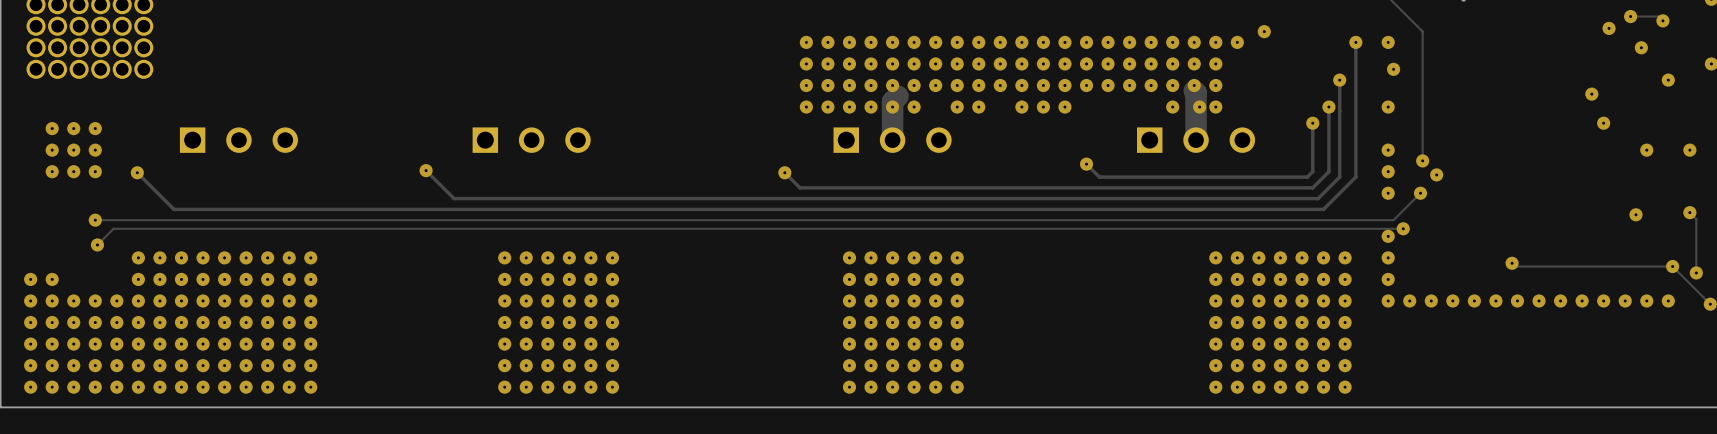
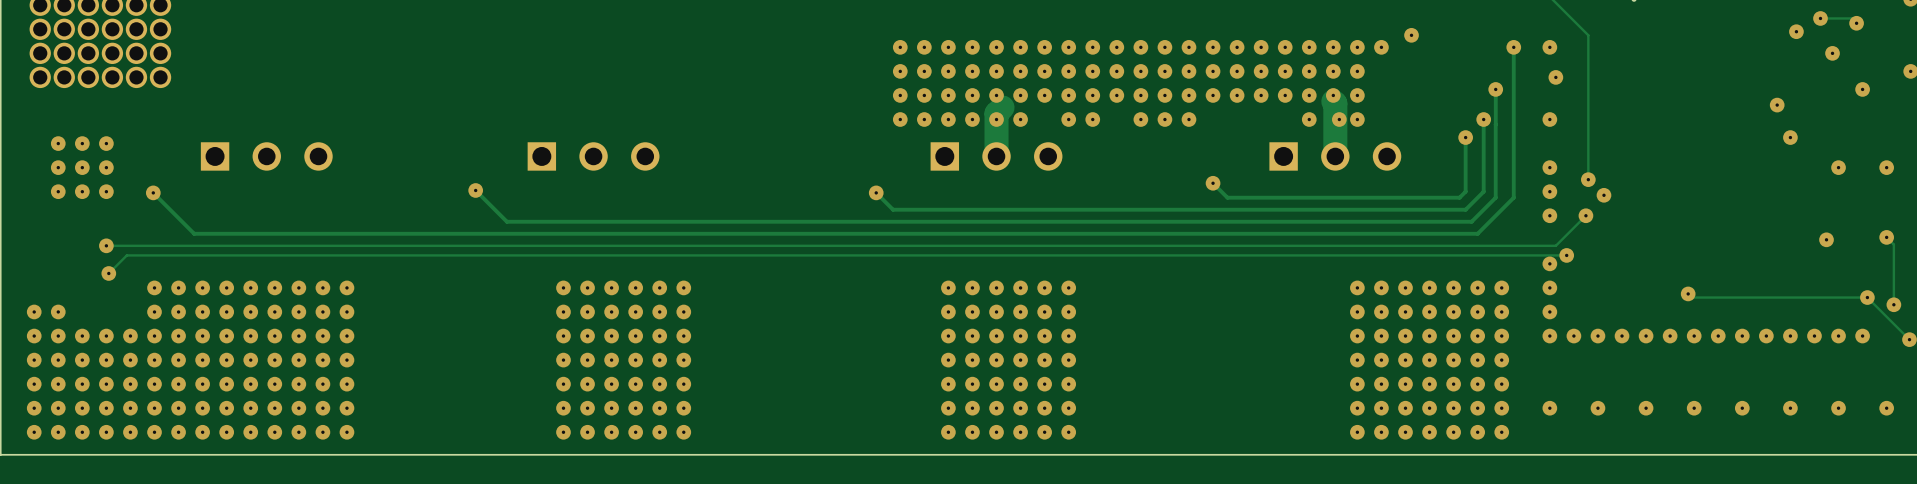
via: none -> (1549, 408)
via: none -> (1597, 408)
via: none -> (1646, 408)
via: none -> (1694, 408)
via: none -> (1742, 408)
via: none -> (1790, 408)
via: none -> (1838, 408)
via: none -> (1886, 408)

